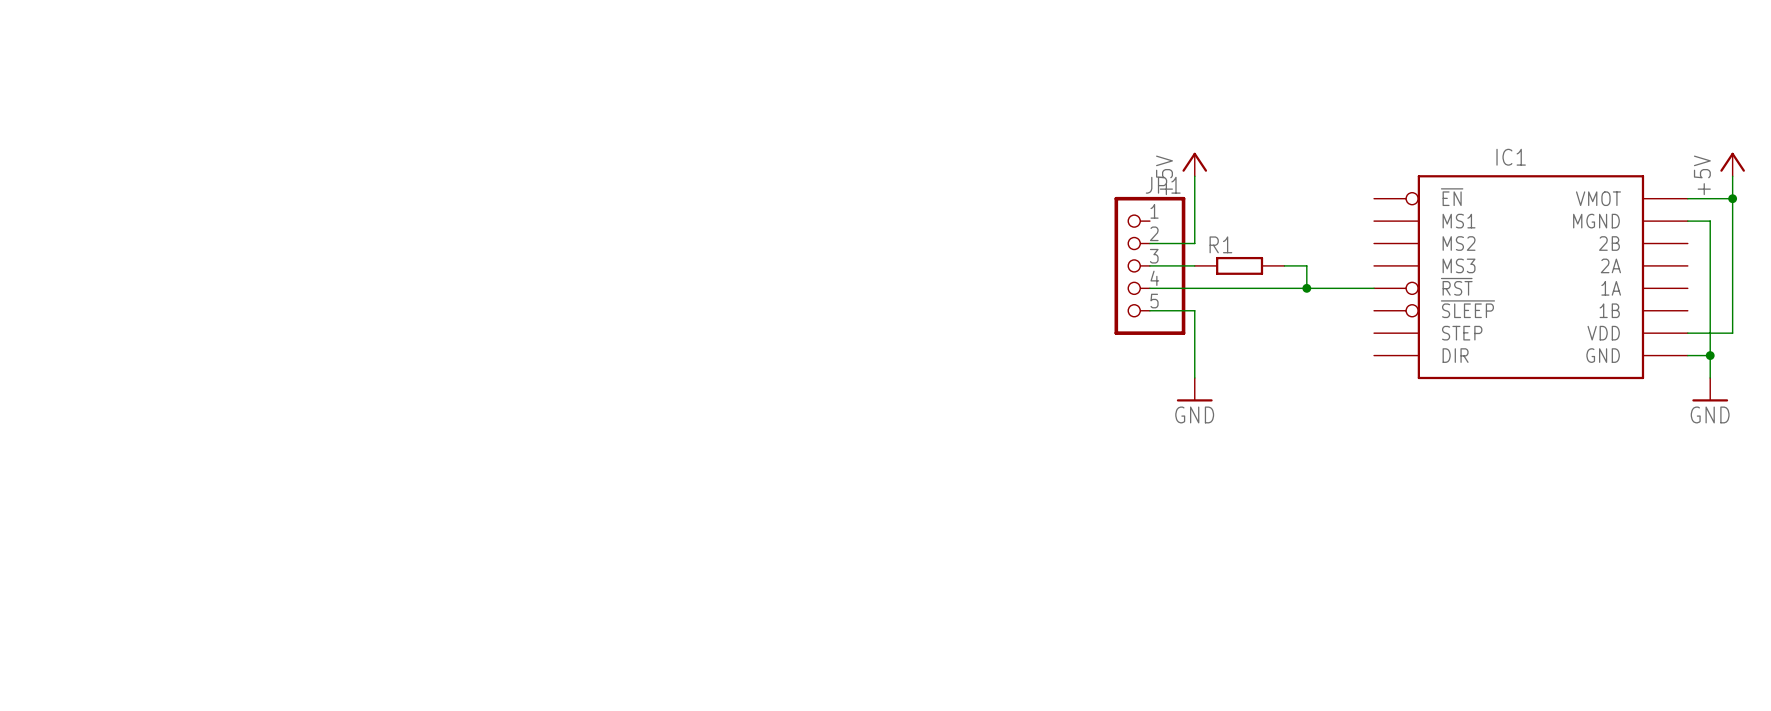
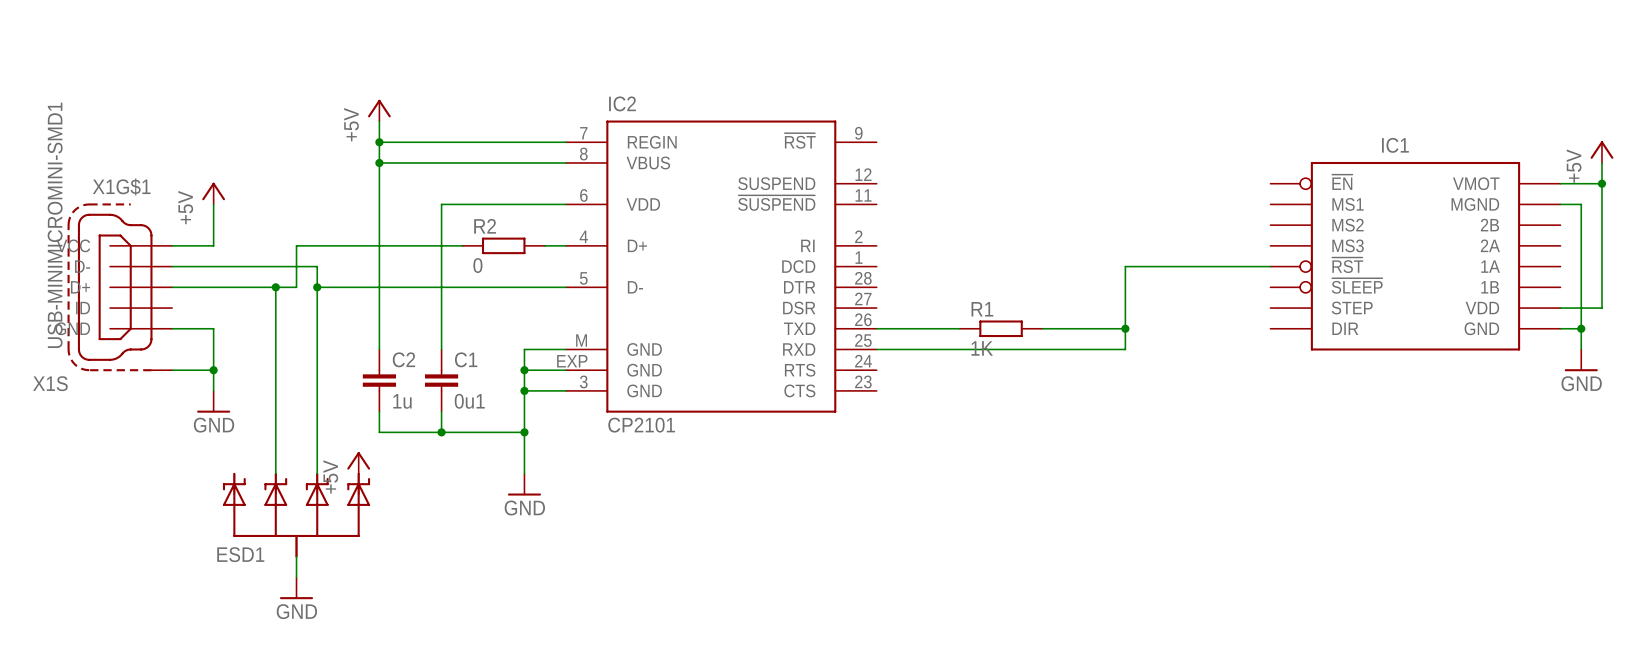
power symbol: none -> +5V (379, 110)
wire: none -> (379, 121) (379, 349)
wire: none -> (379, 142) (565, 142)
junction: none -> (379, 142)
power symbol: +5V (1194, 164) -> none
wire: none -> (379, 162) (565, 162)
junction: none -> (379, 162)
wire: (1194, 176) (1194, 243) (1149, 243) -> none
power symbol: none -> +5V (213, 193)
wire: none -> (213, 204) (213, 245) (172, 245)
wire: none -> (565, 204) (441, 204) (441, 349)
wire: none -> (462, 245) (296, 245) (296, 287) (172, 287)
R2: none -> 0 (503, 245)
wire: none -> (545, 245) (565, 245)
wire: (1149, 265) (1194, 265) -> none
JP1: (1149, 265) -> none
R1 position: (1239, 265) -> (1001, 328)
wire: (1284, 265) (1306, 265) (1306, 288) -> none
wire: none -> (172, 266) (317, 266) (317, 473)
IC2: none -> CP2101 (721, 266)
wire: (1149, 288) (1217, 288) -> (876, 349) (1125, 349) (1125, 266)
junction: (1306, 288) -> none
X1S: none -> (119, 287)
X1G$1: none -> USB-MINIMICROMINI-SMD1 (125, 287)
wire: none -> (275, 287) (275, 473)
junction: none -> (275, 287)
wire: none -> (317, 287) (565, 287)
junction: none -> (317, 287)
wire: (1149, 310) (1194, 310) (1194, 377) -> none
wire: none -> (172, 328) (213, 328) (213, 390)
wire: none -> (876, 328) (959, 328)
wire: none -> (1042, 328) (1125, 328)
junction: none -> (1125, 328)
R1 value: none -> 1K (982, 348)
wire: none -> (565, 349) (524, 349) (524, 473)
power symbol: GND (1194, 389) -> none
wire: none -> (172, 370) (213, 370)
junction: none -> (213, 370)
wire: none -> (524, 370) (565, 370)
junction: none -> (524, 370)
C2: none -> 1u (379, 380)
C1: none -> 0u1 (441, 380)
wire: none -> (524, 390) (565, 390)
junction: none -> (524, 390)
power symbol: none -> GND (213, 401)
wire: none -> (379, 411) (379, 432) (524, 432)
wire: none -> (441, 411) (441, 432)
junction: none -> (441, 432)
junction: none -> (524, 432)
power symbol: none -> +5V (358, 462)
power symbol: none -> GND (524, 484)
ESD1: none -> (296, 515)
wire: none -> (296, 556) (296, 577)
power symbol: none -> GND (296, 588)

